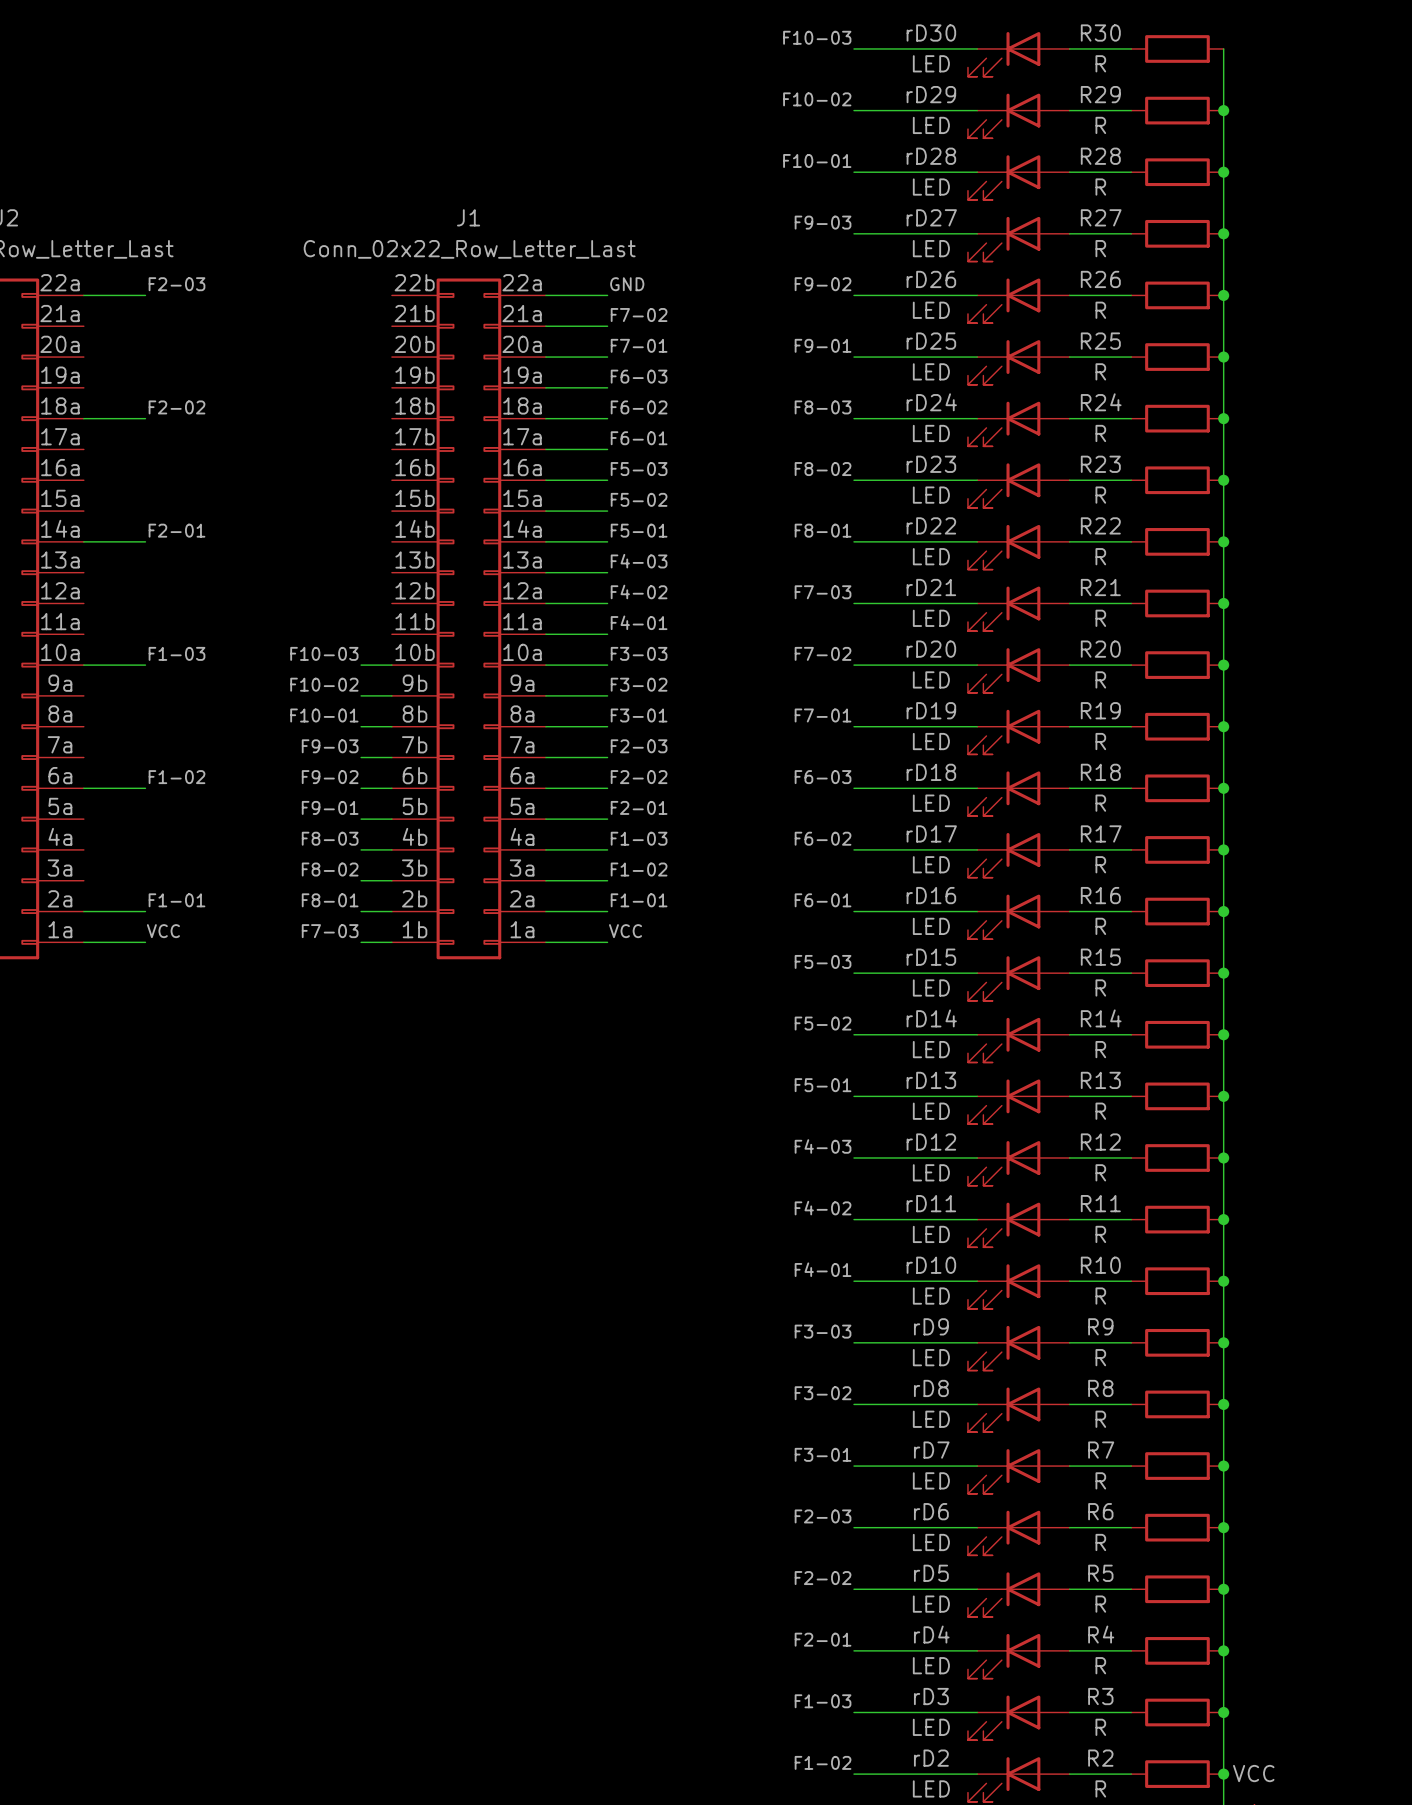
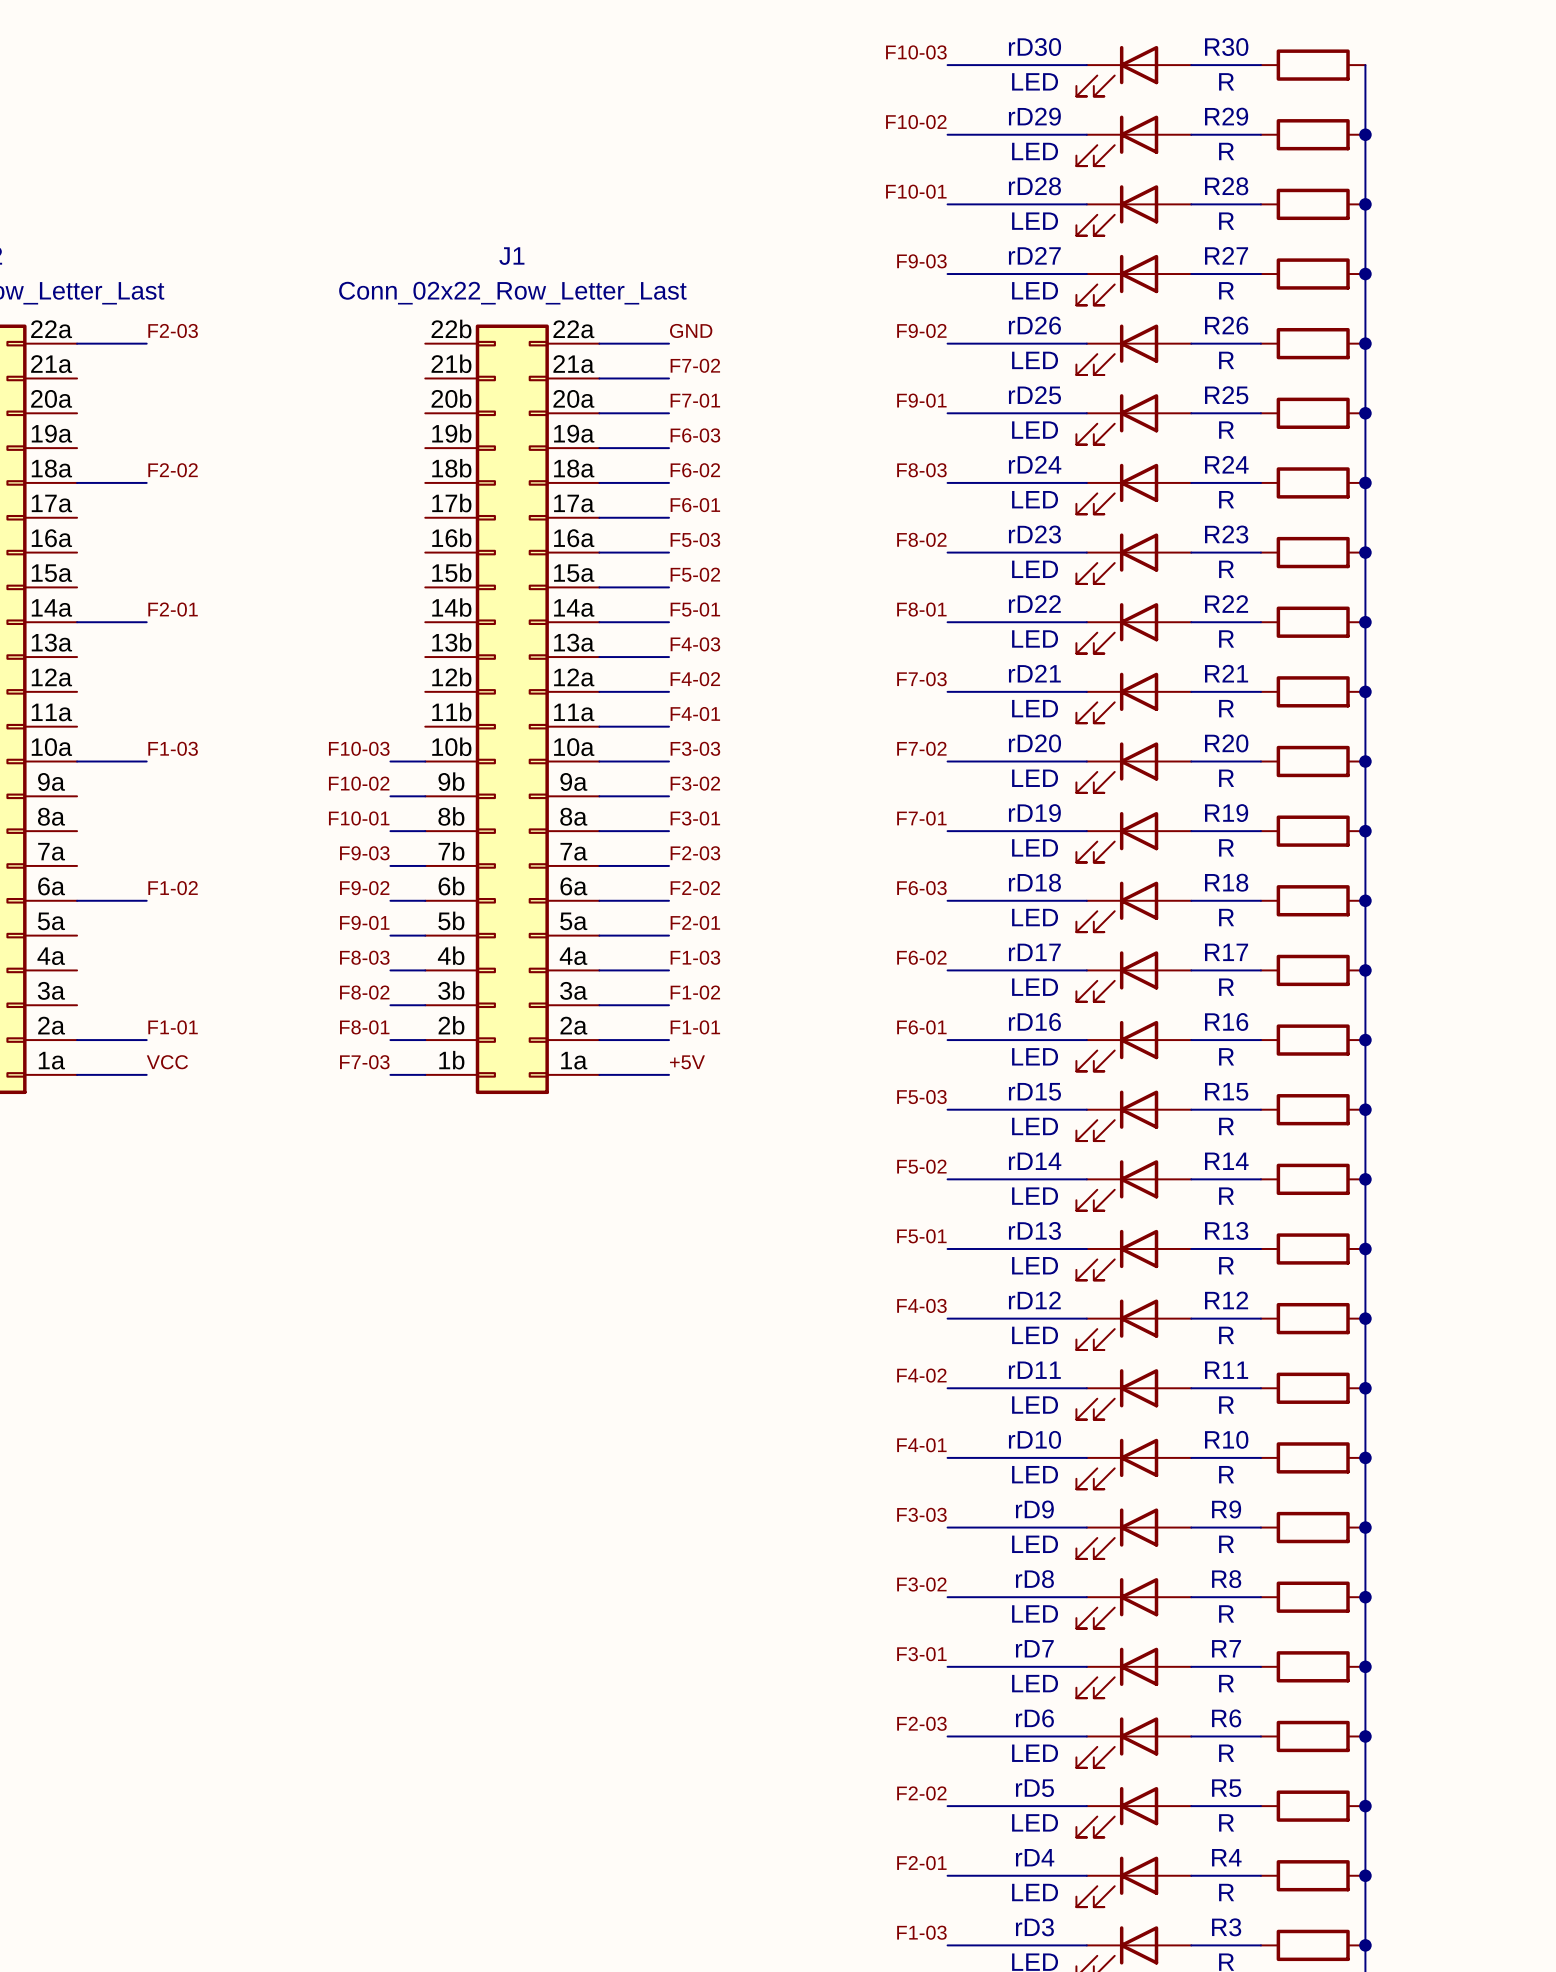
label: VCC (625, 931) -> +5V (687, 1062)

